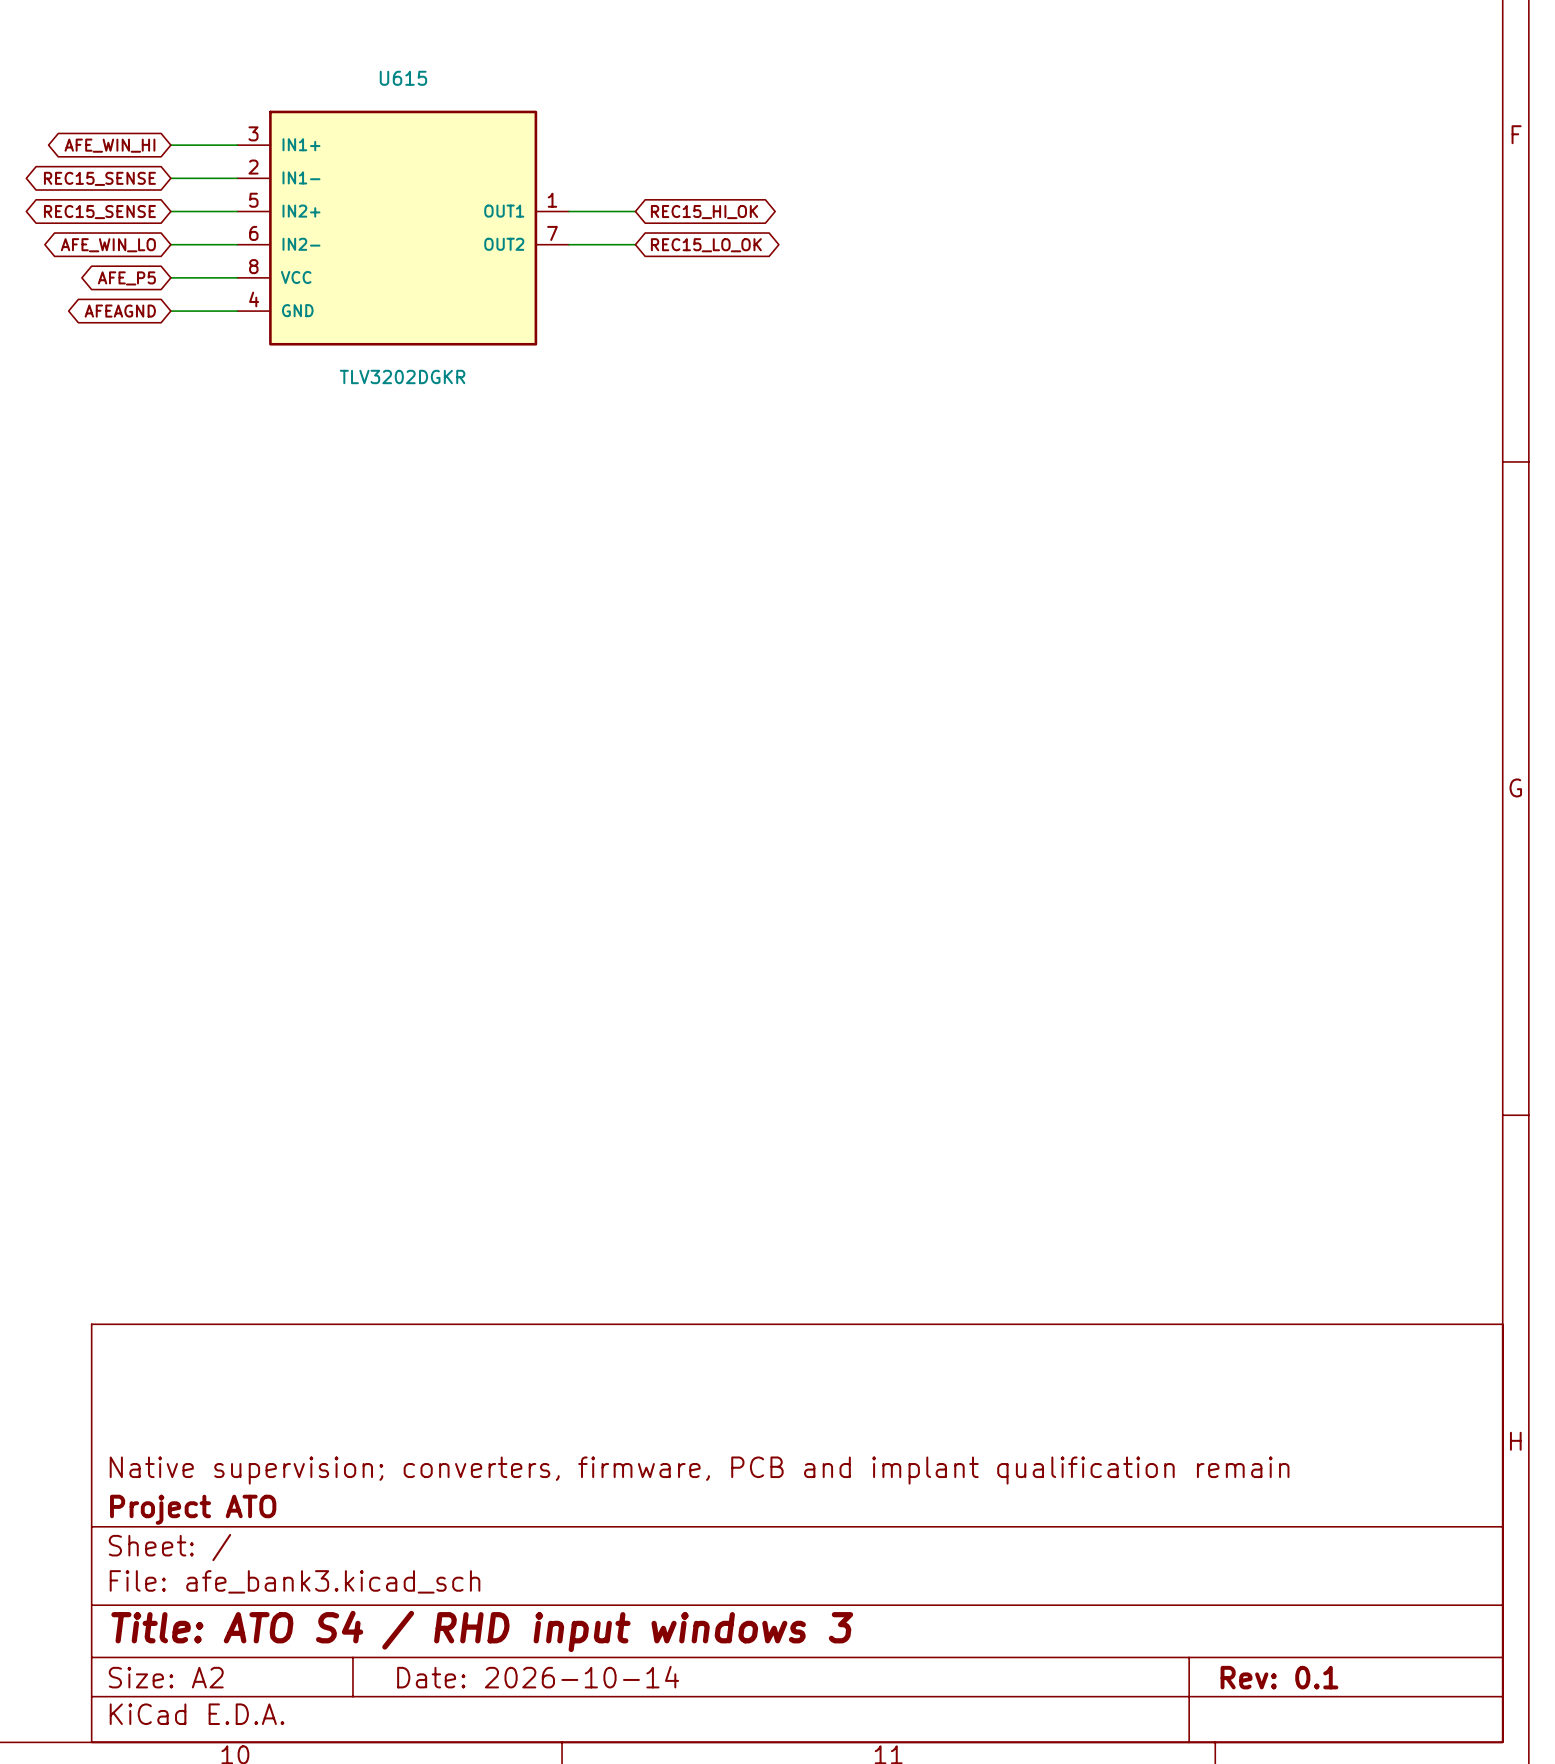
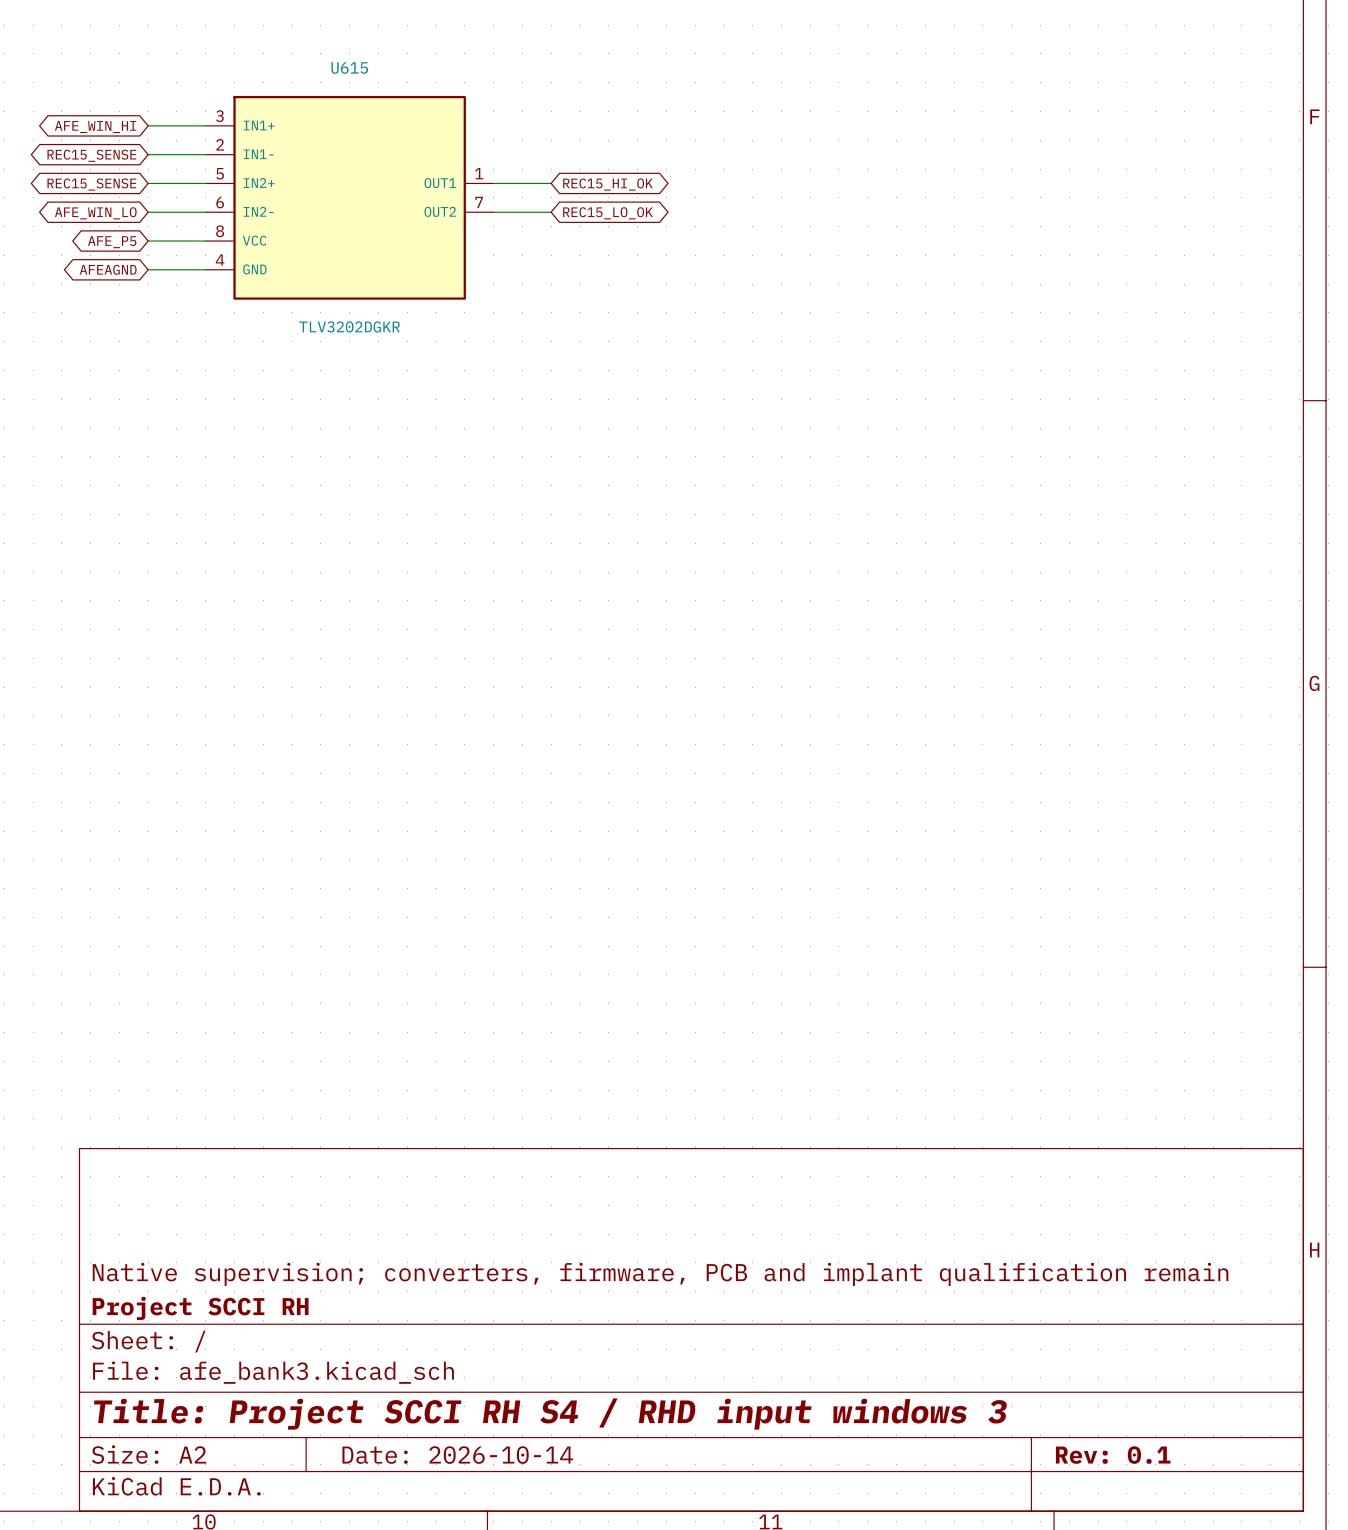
title block: Project ATO (193, 1509) -> Project SCCI RH (200, 1308)
title block: Title: ATO S4 / RHD input windows 3 (482, 1631) -> Title: Project SCCI RH S4 / RHD input windows 3 (550, 1414)

